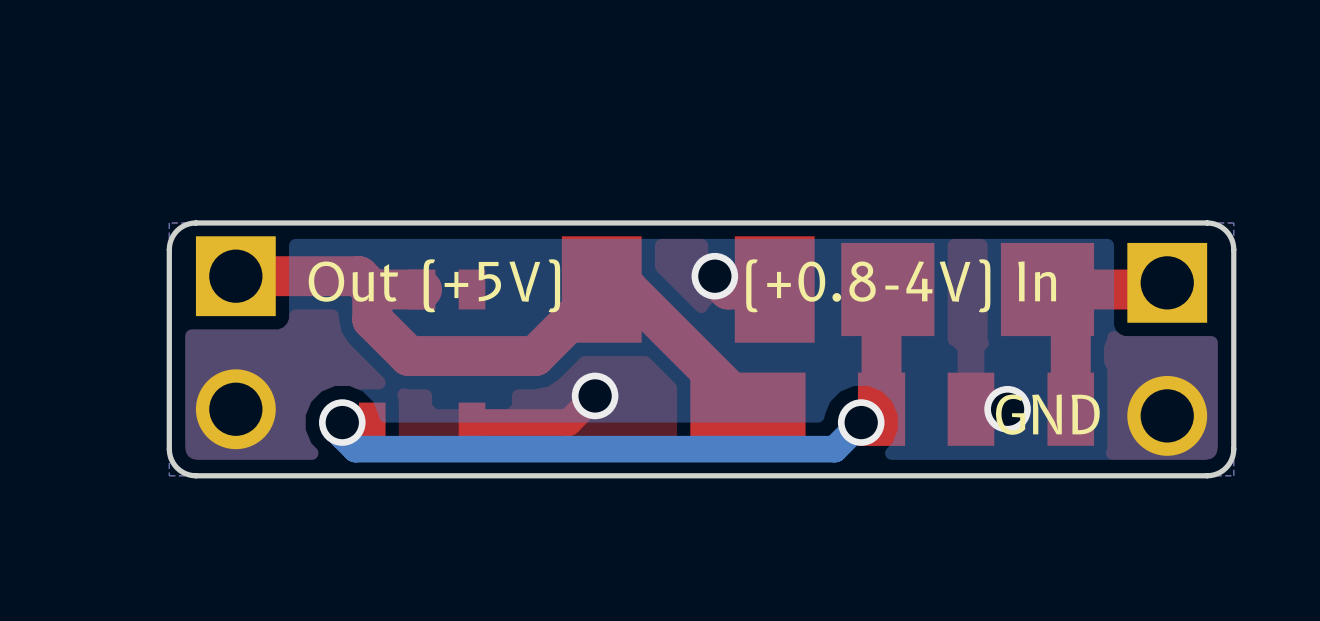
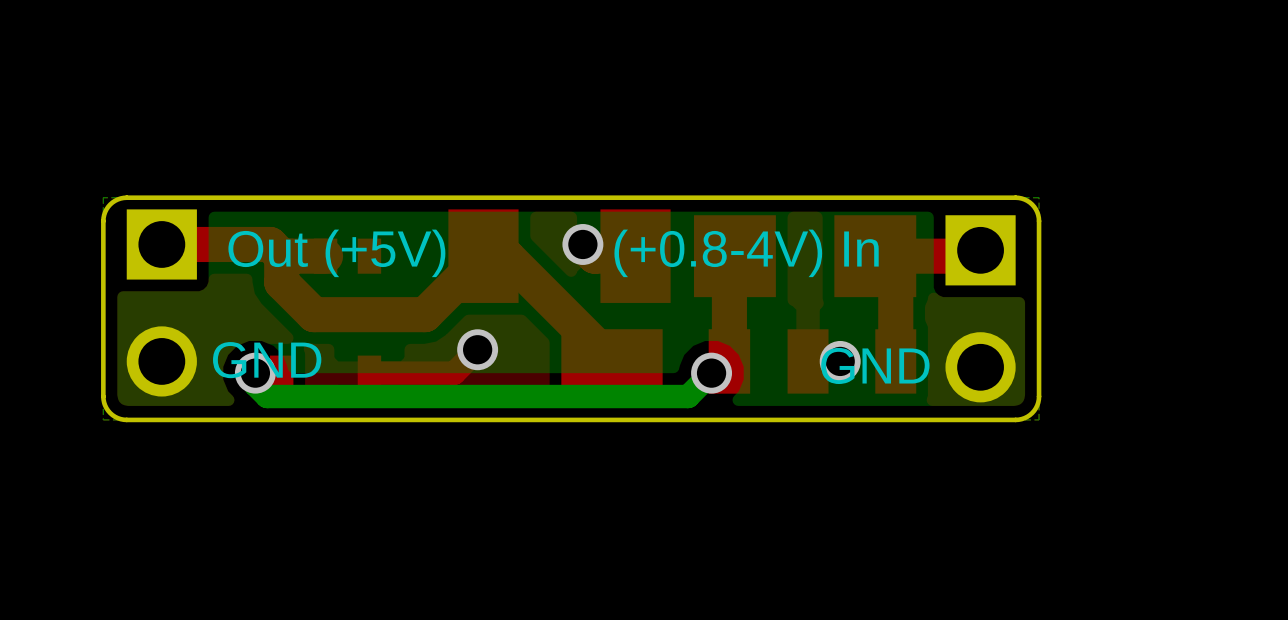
text: none -> GND (267, 360)

